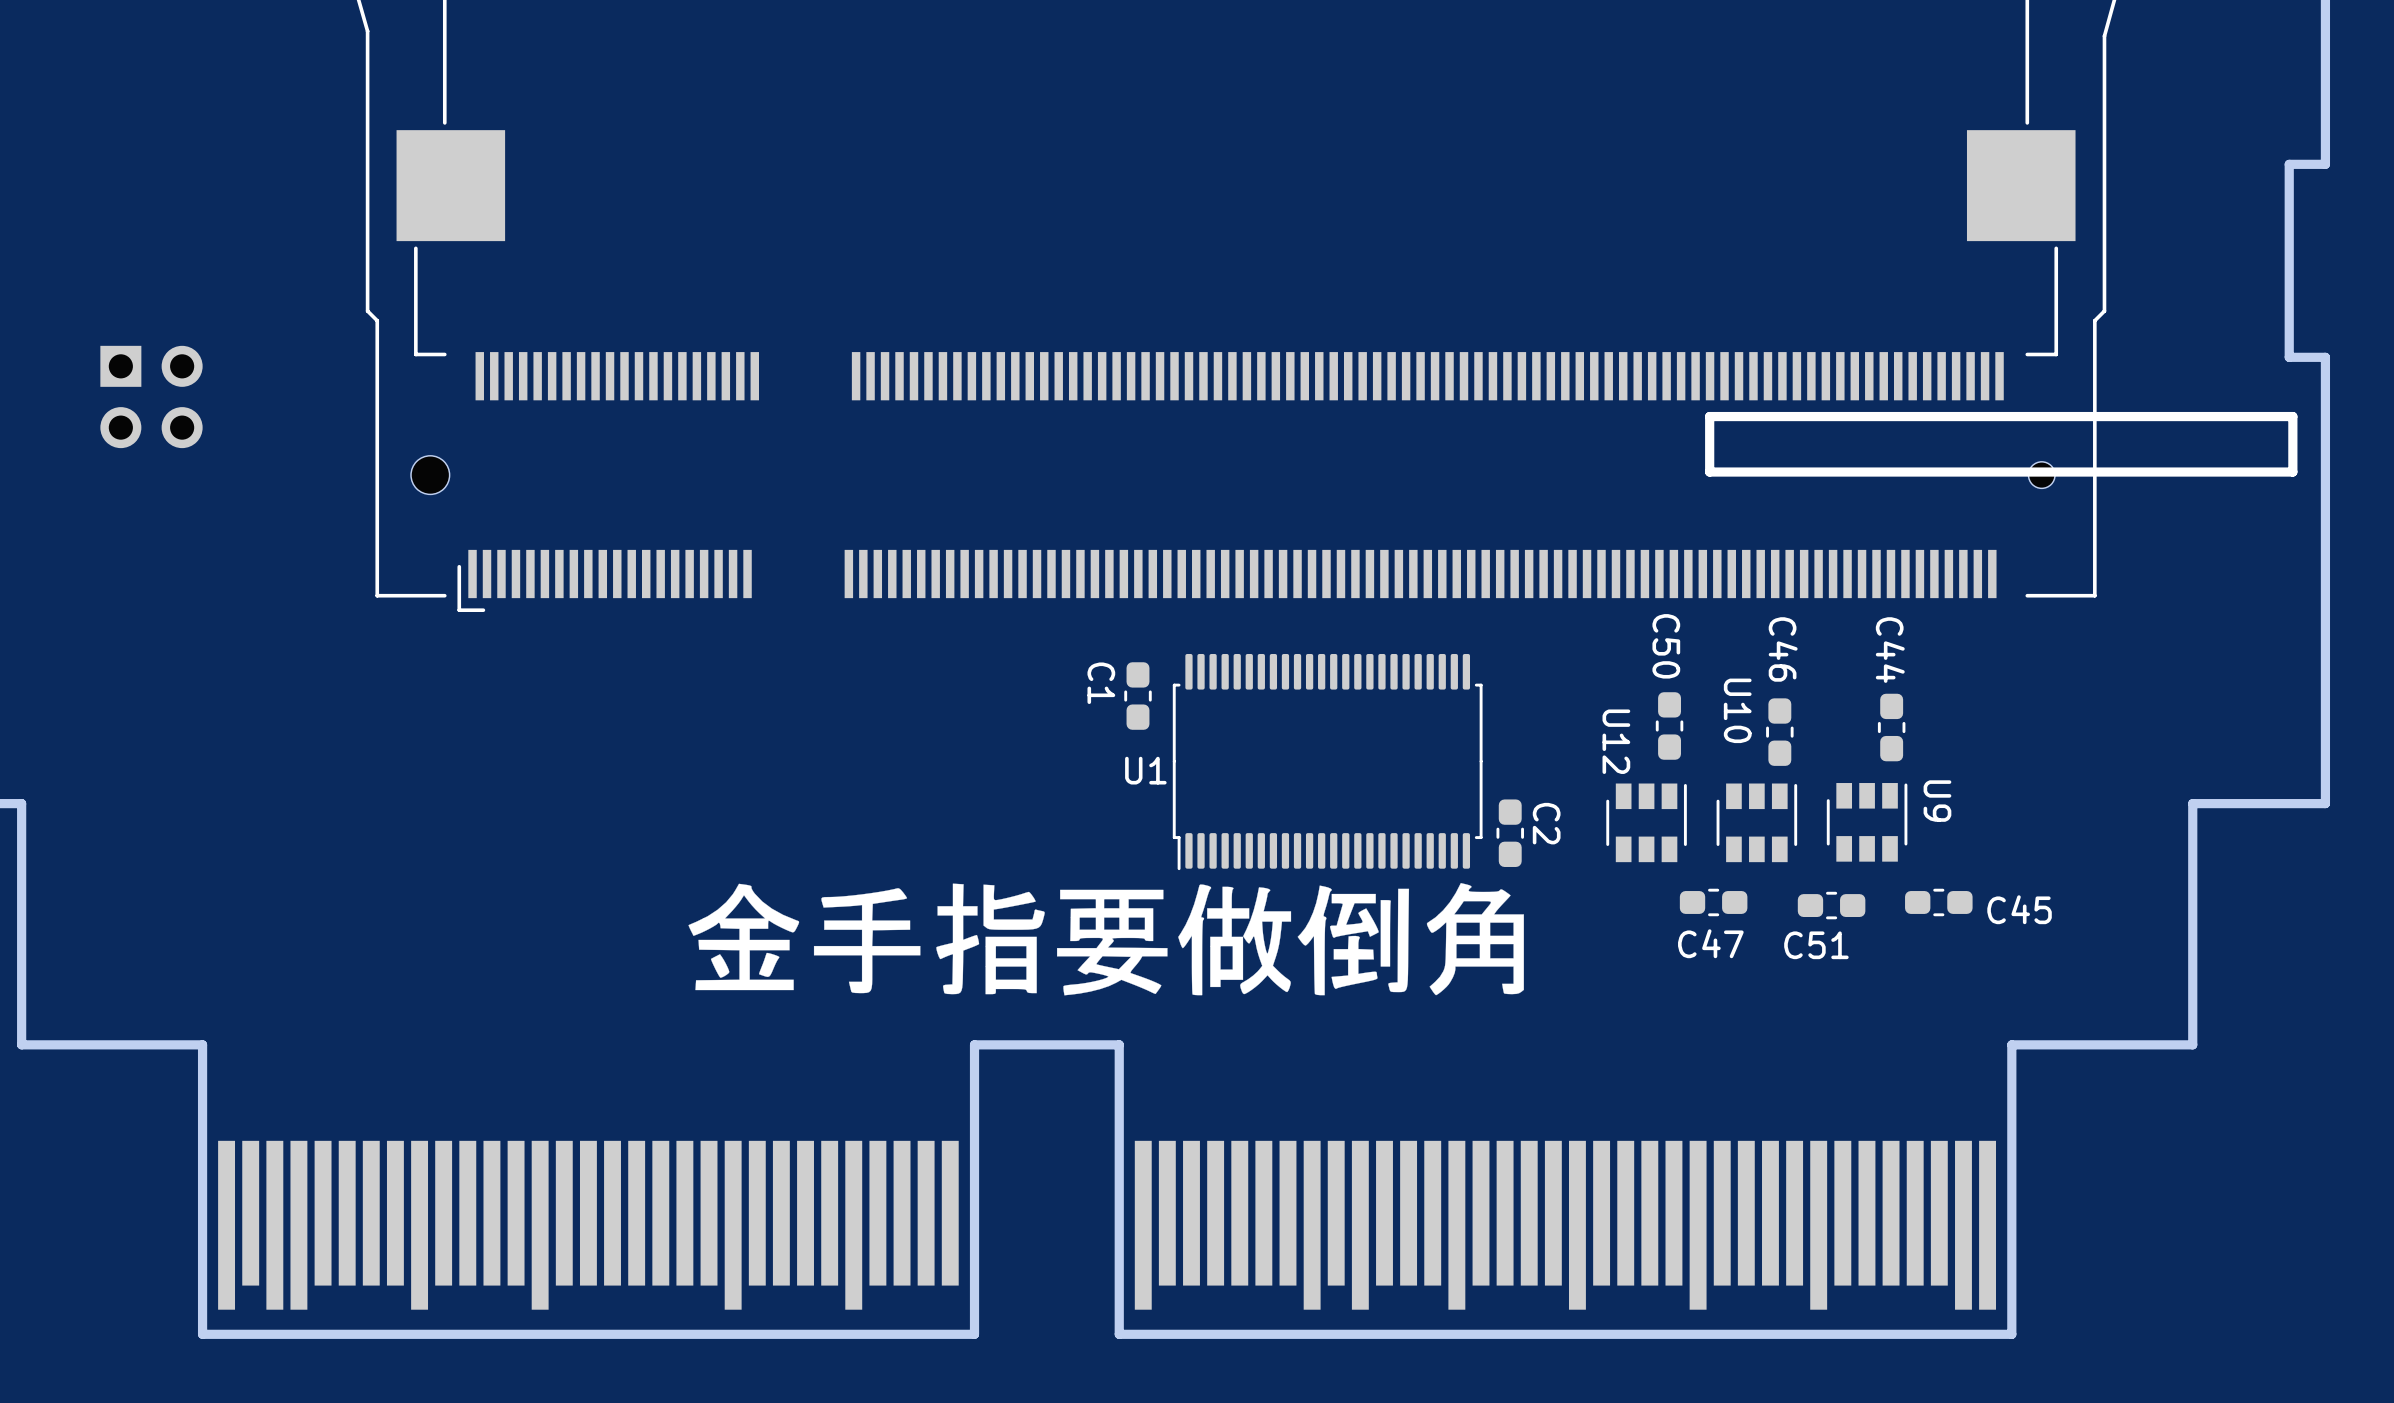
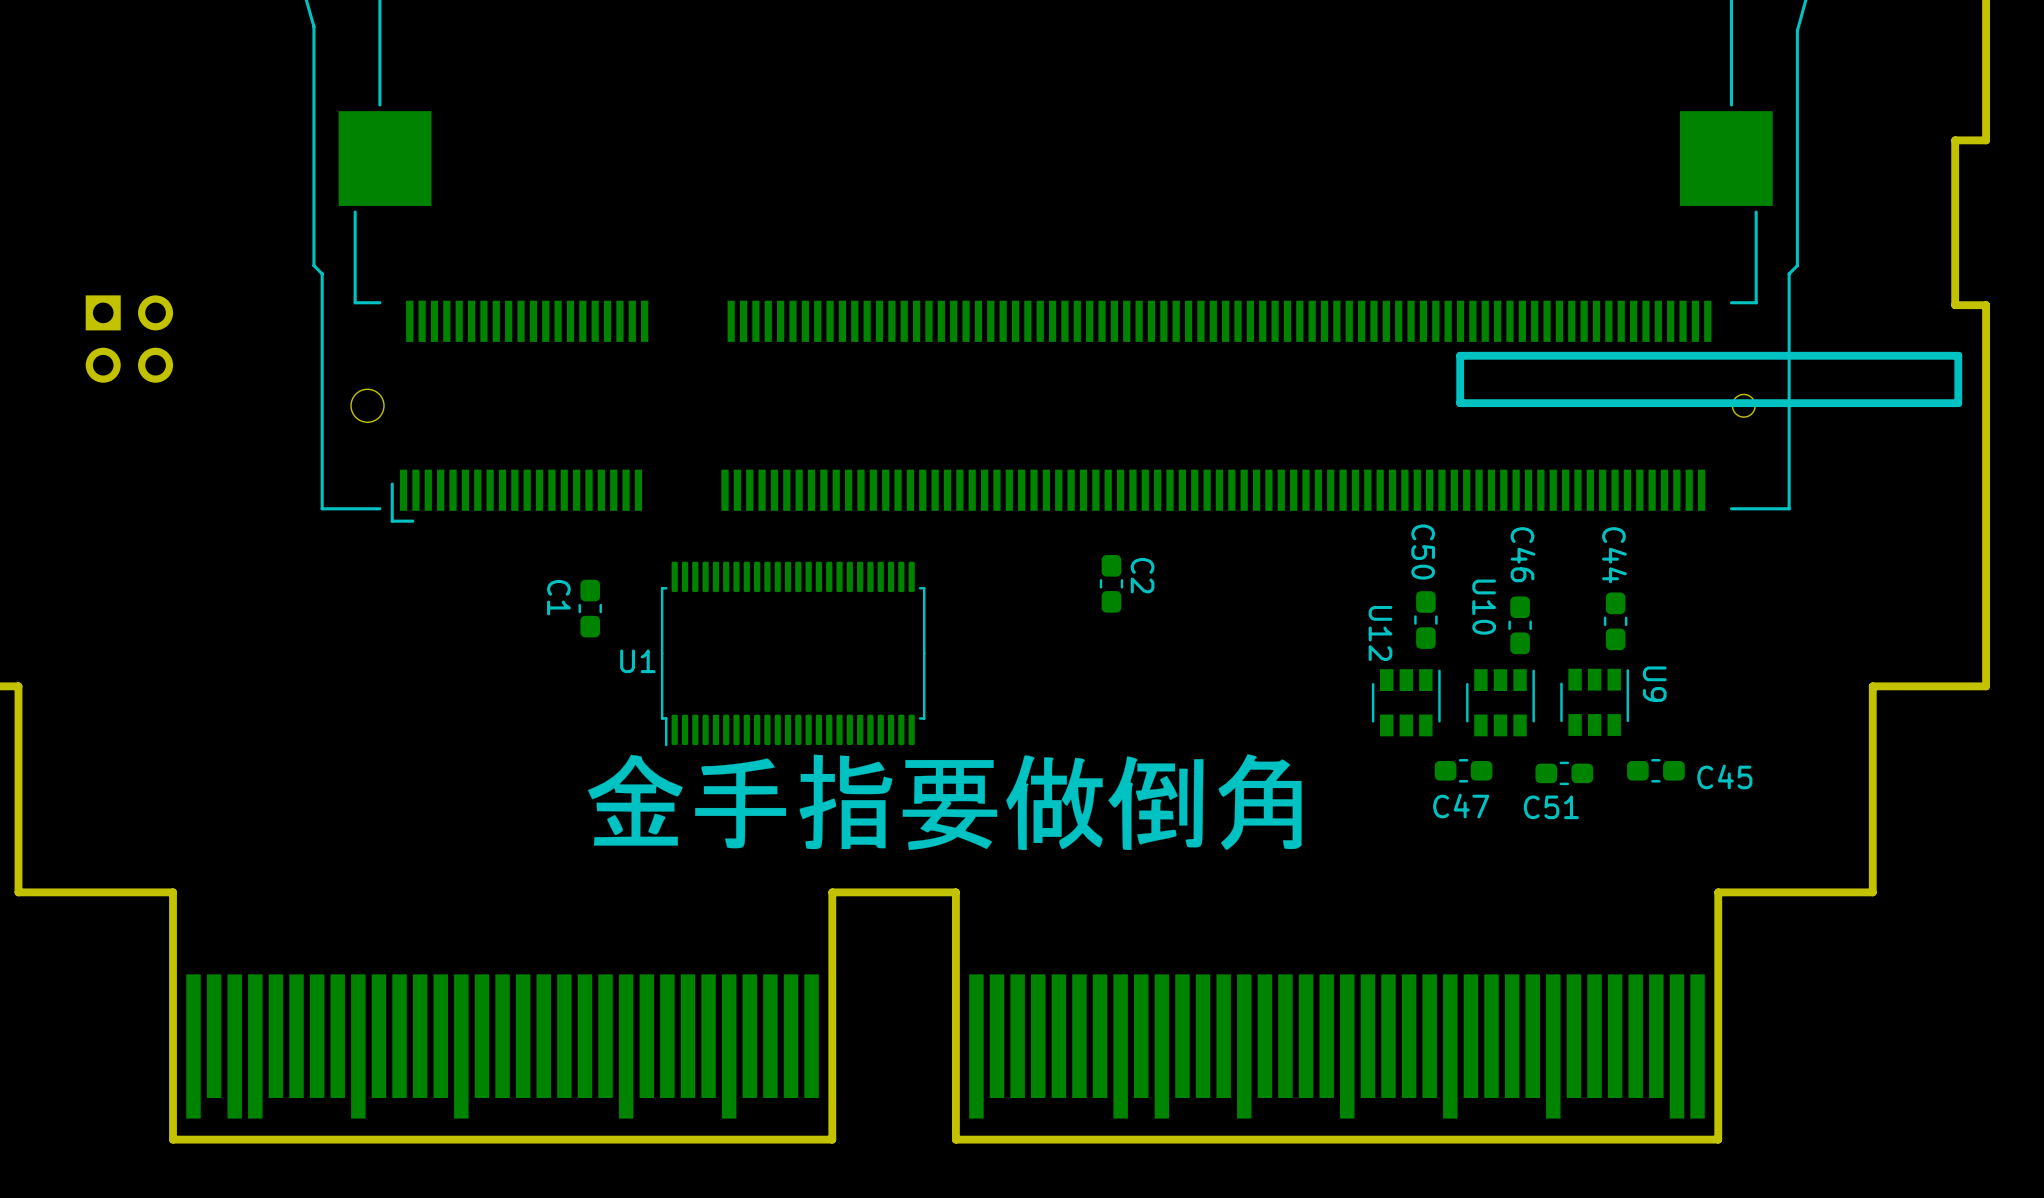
C1 position: (1138, 696) -> (590, 608)
U1 position: (1327, 762) -> (793, 654)
C2 position: (1510, 833) -> (1111, 583)

